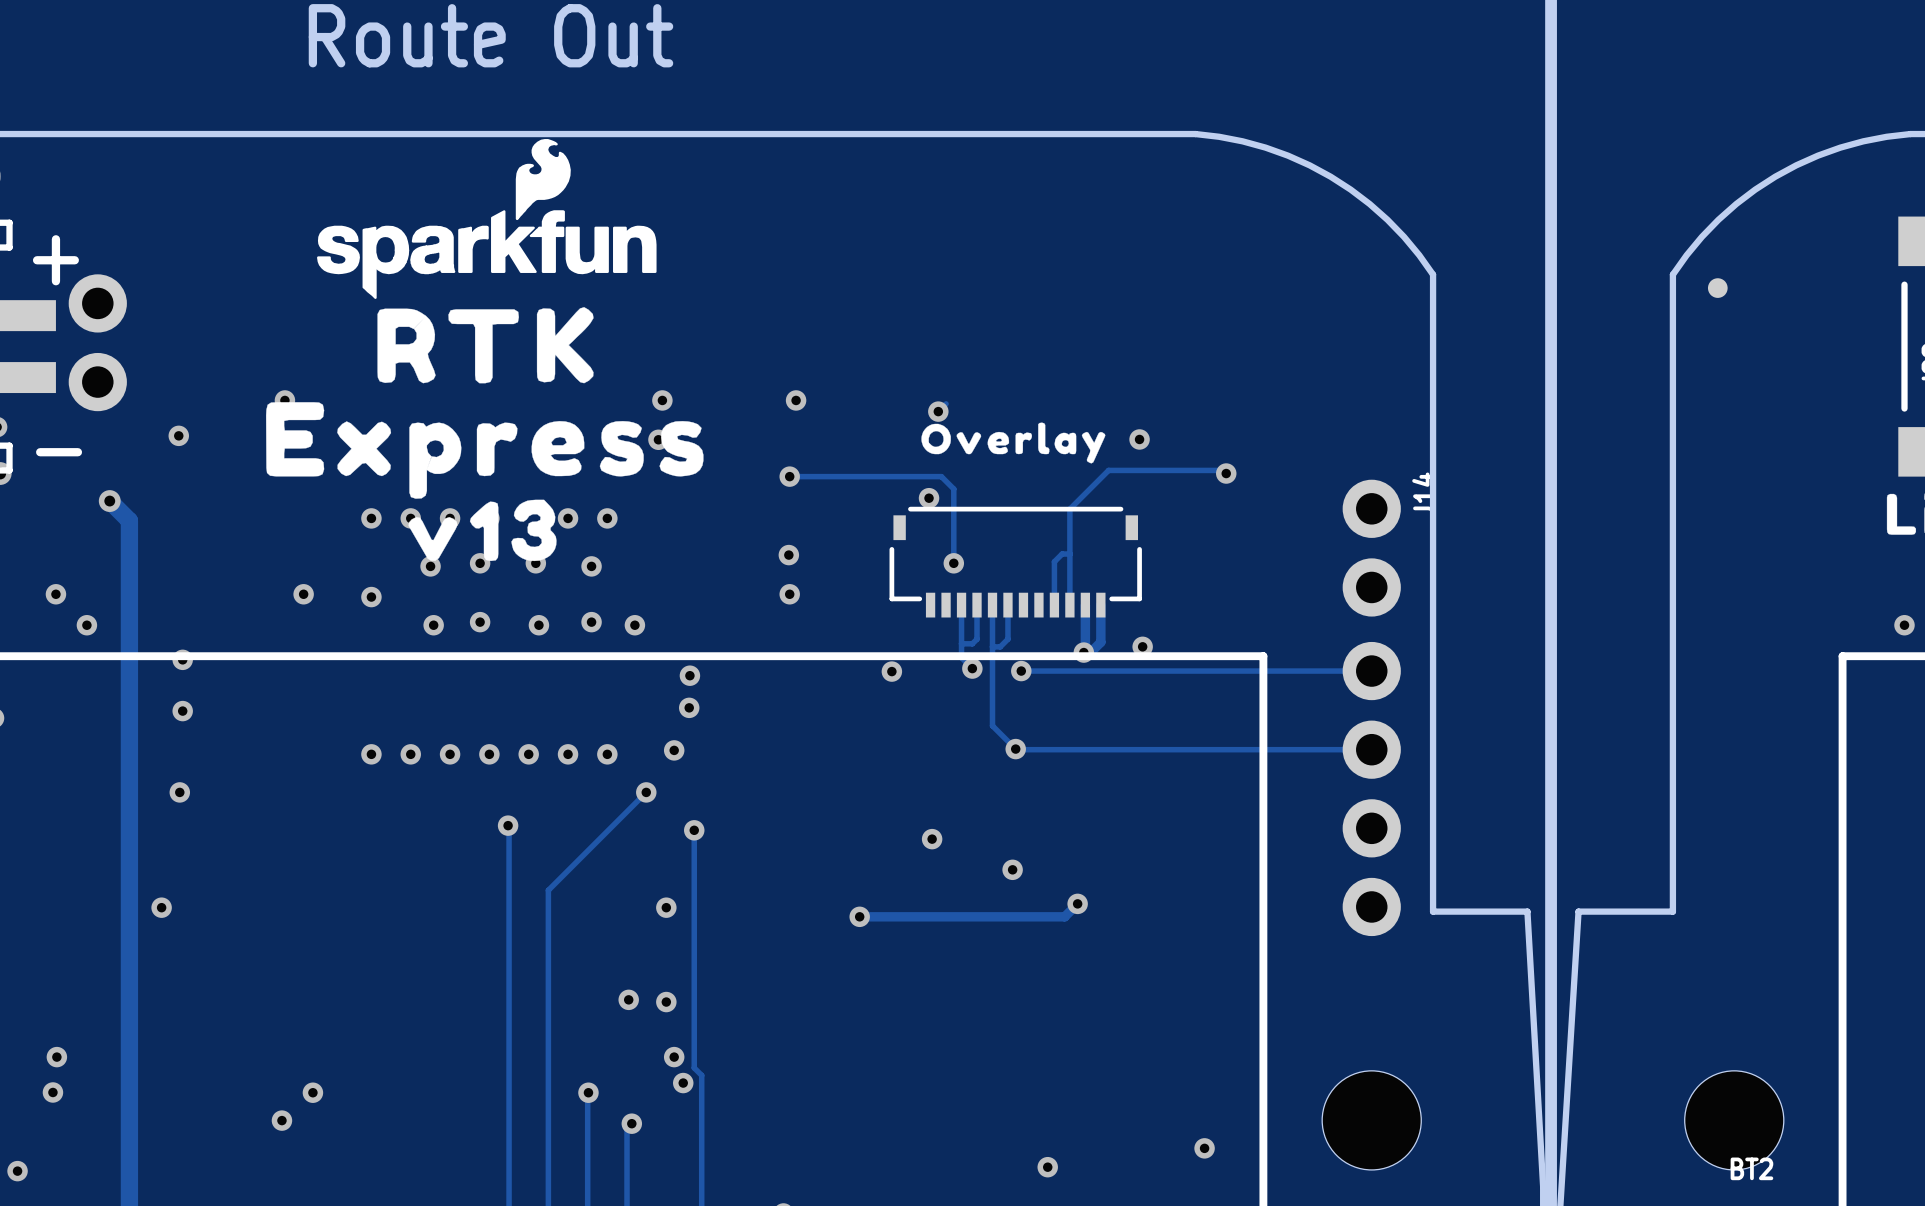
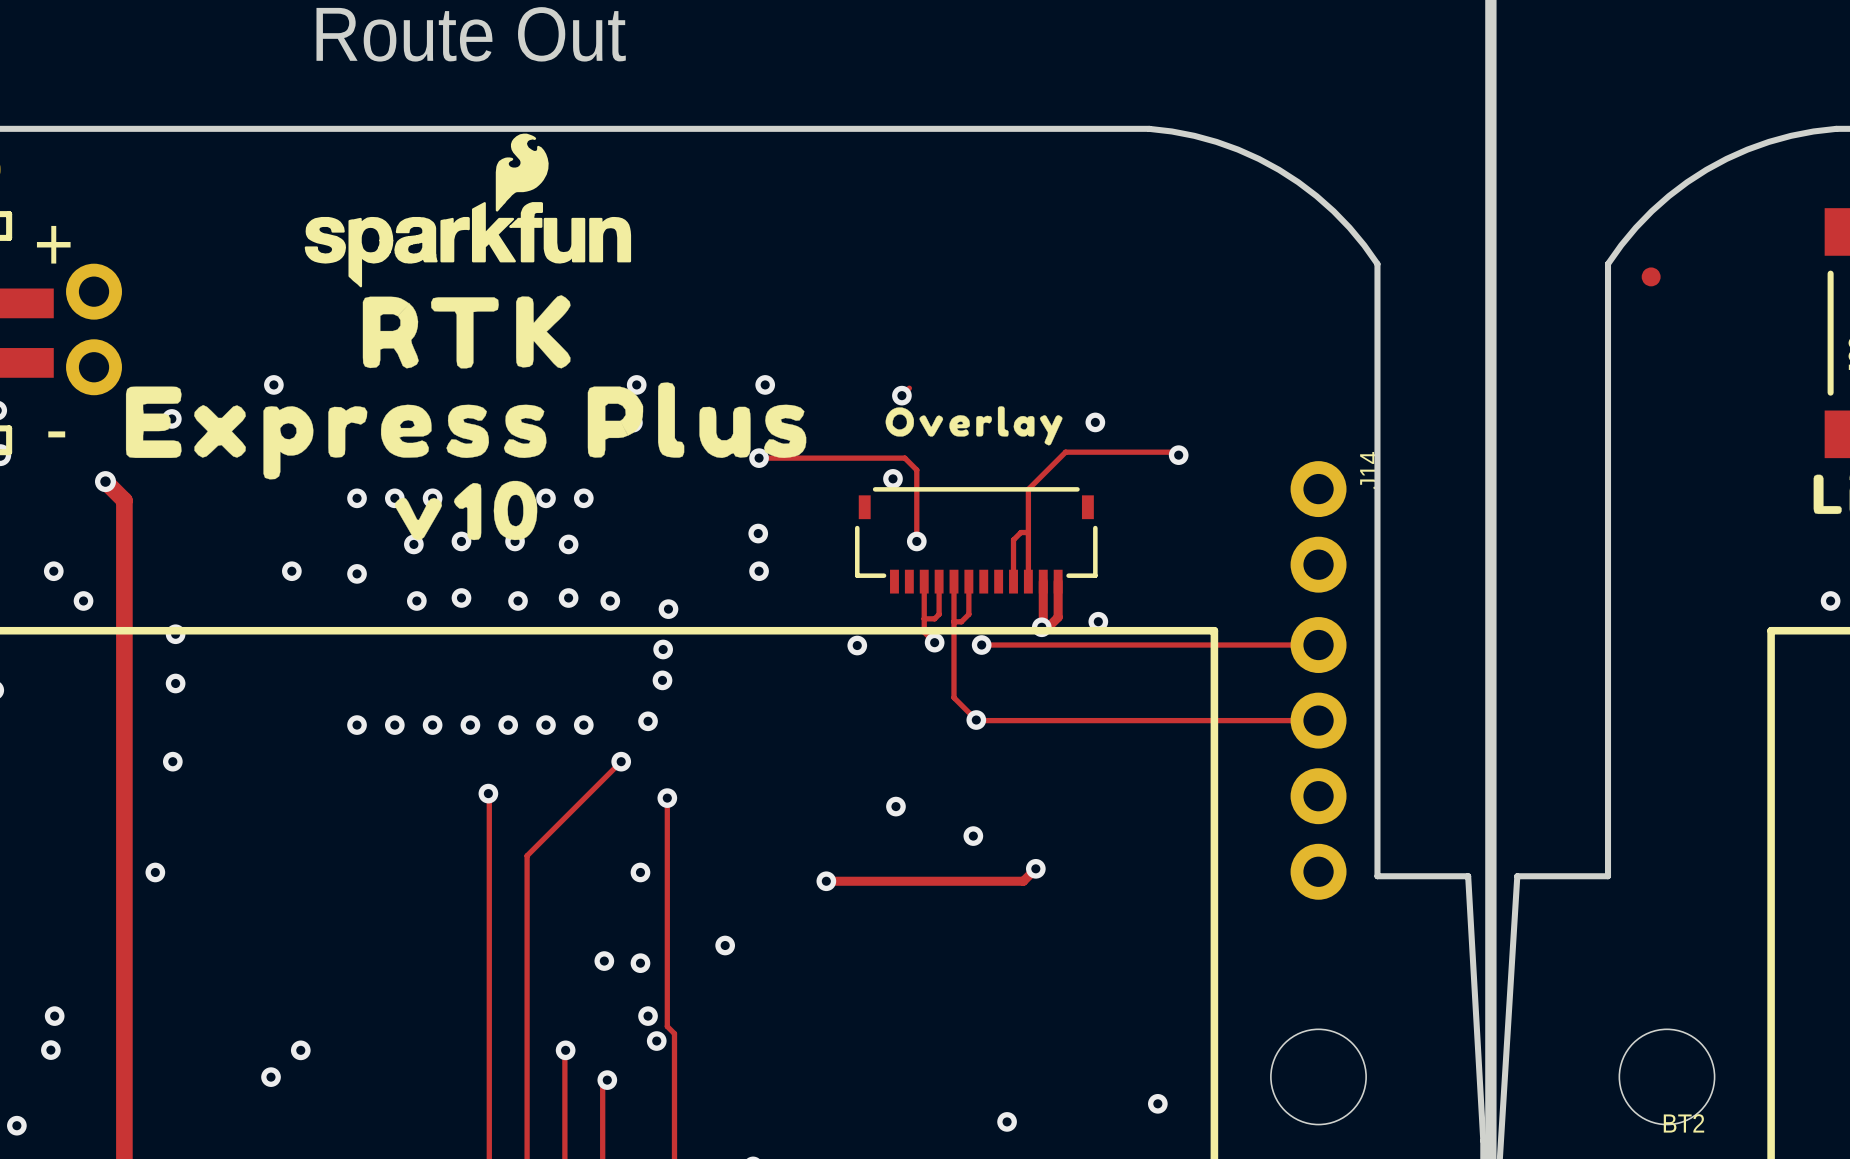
drawing shape: [266, 402, 704, 499] -> [125, 382, 807, 480]
drawing shape: [408, 499, 557, 562] -> [394, 480, 538, 541]
via: none -> (668, 609)
via: none -> (725, 945)

